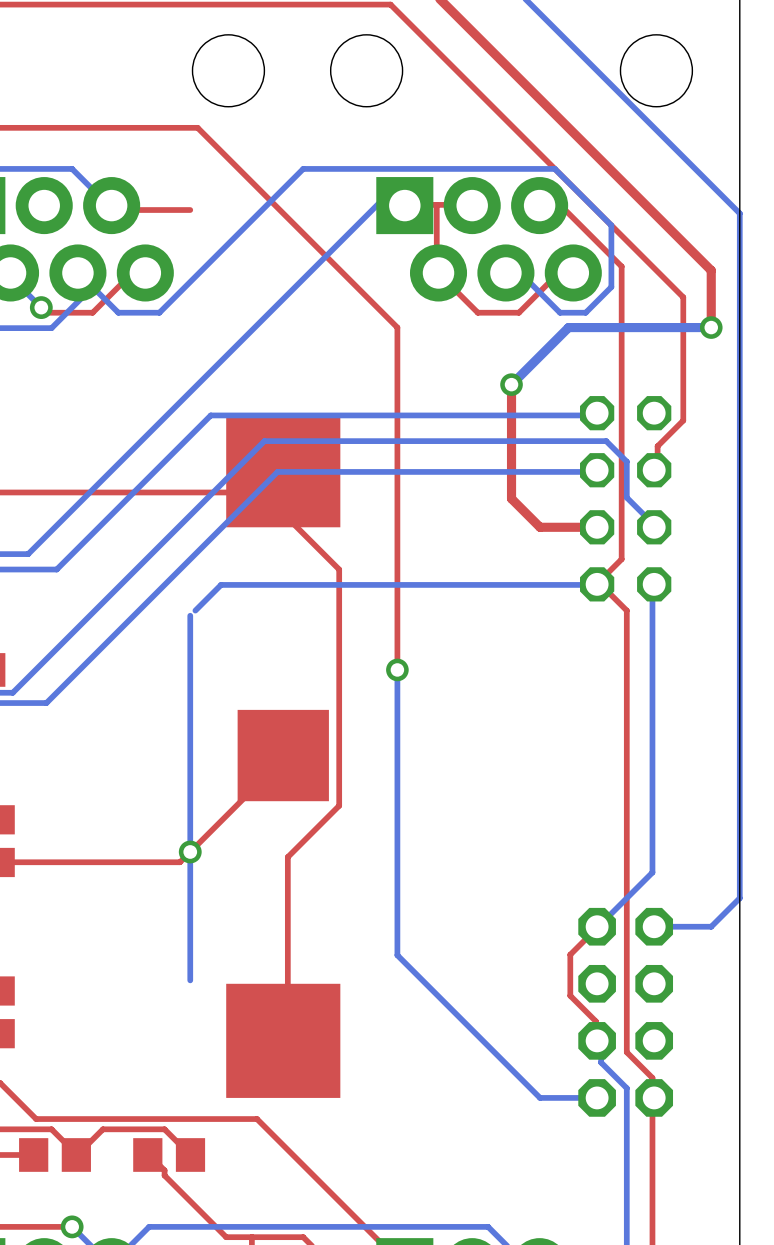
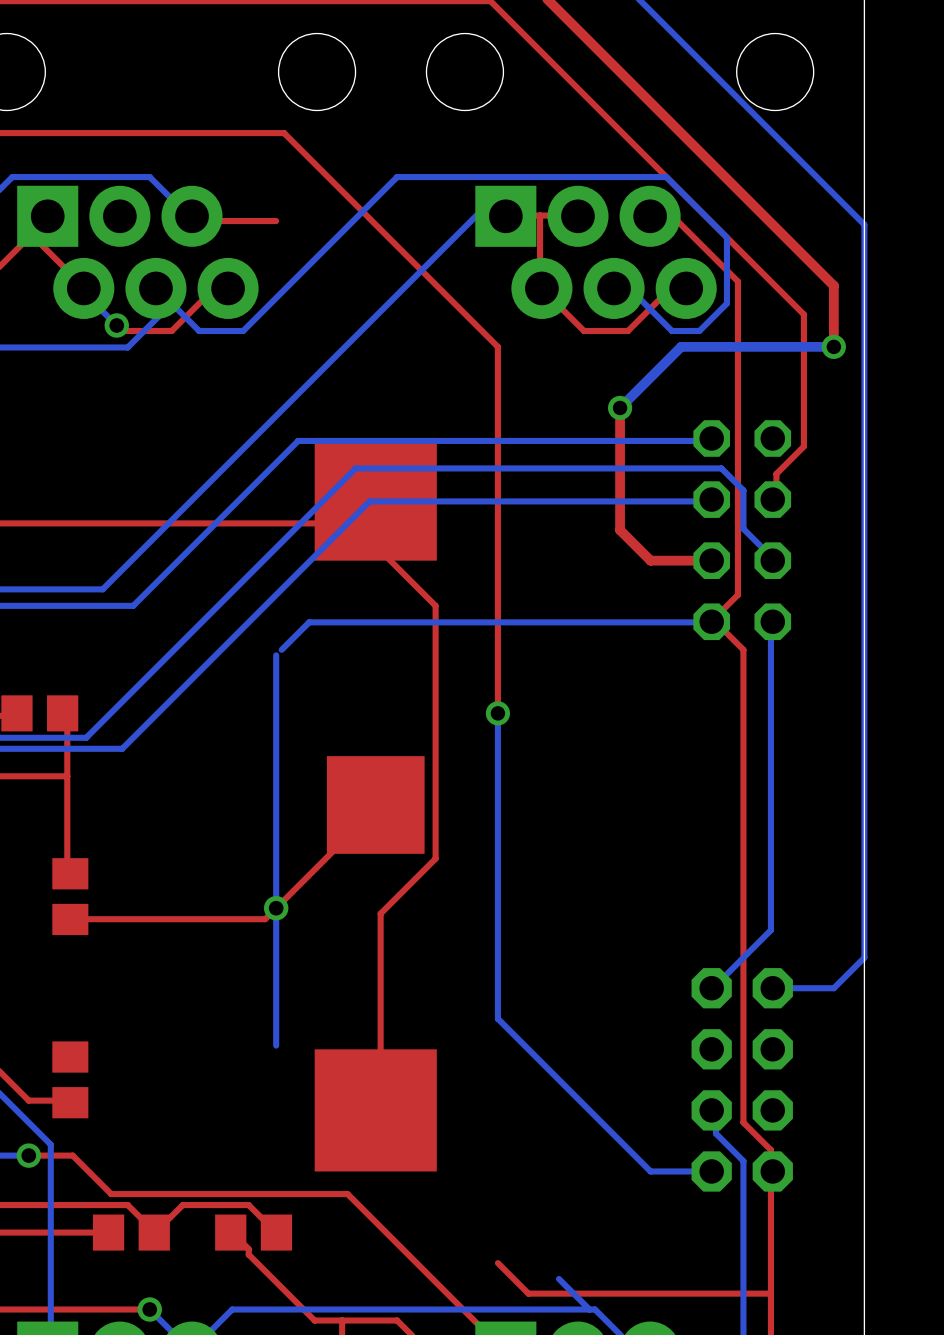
top track: (597, 926) (570, 954) (570, 995) (595, 1021) (597, 1040) -> none
top track: none -> (497, 1263) (528, 1293) (770, 1293)
bottom track: none -> (558, 1278) (589, 1309)

